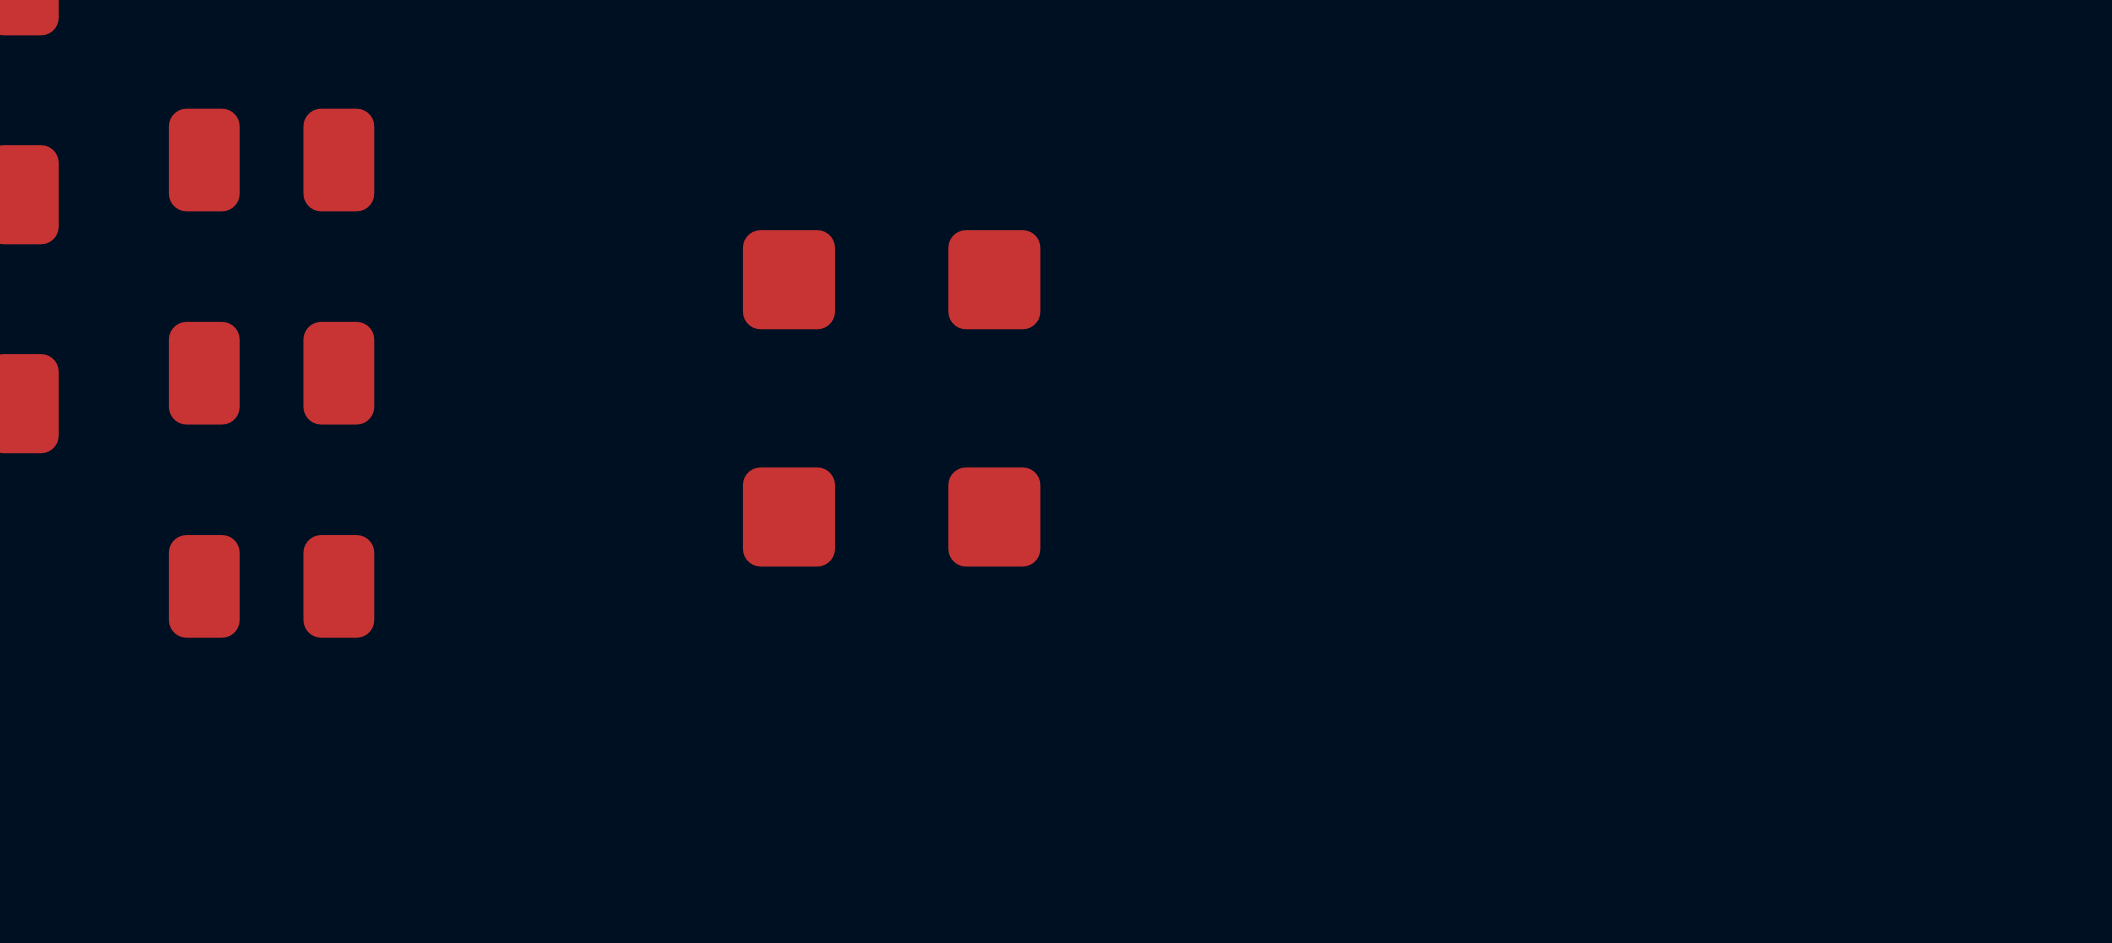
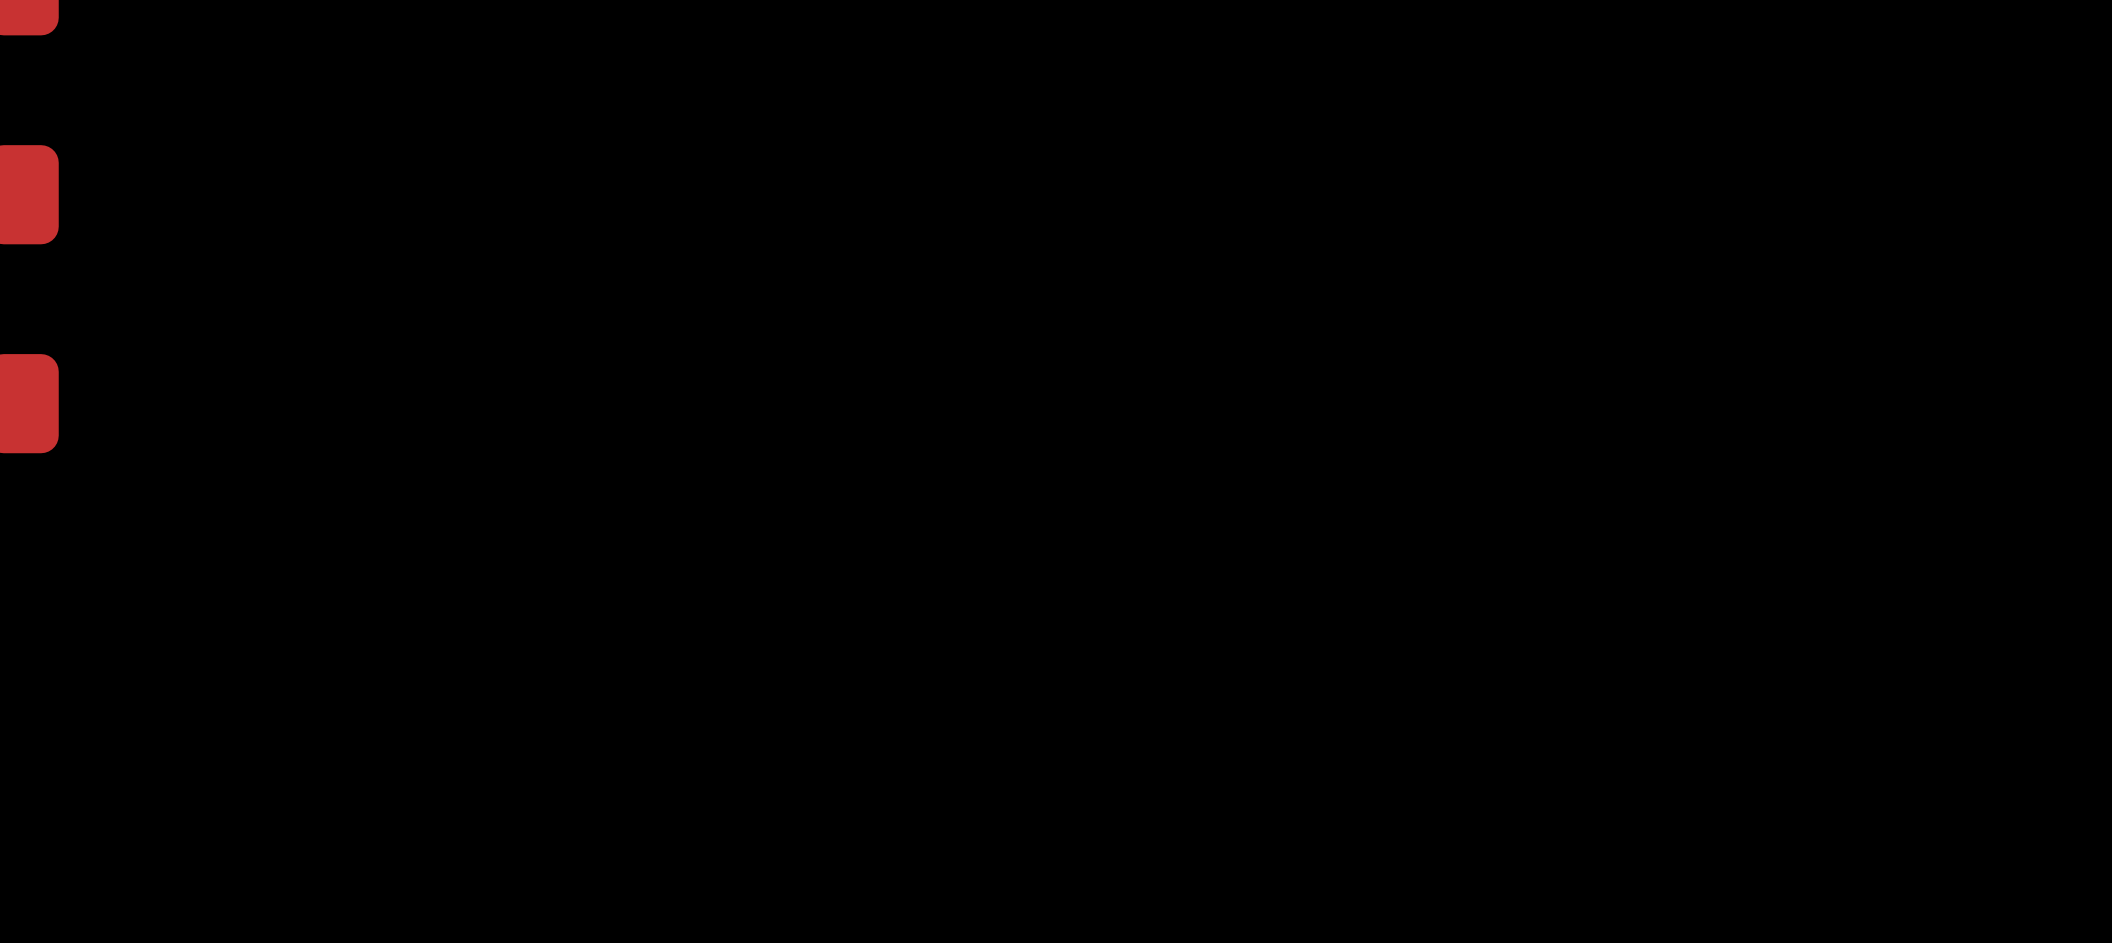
part: (271, 160) -> none
part: (891, 279) -> none
part: (271, 373) -> none
part: (891, 516) -> none
part: (271, 586) -> none

